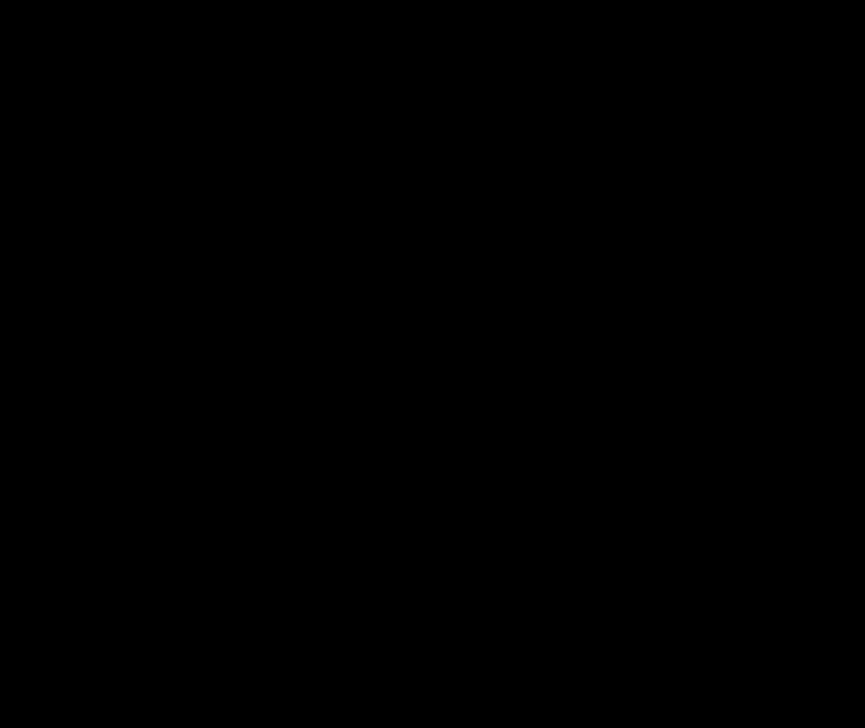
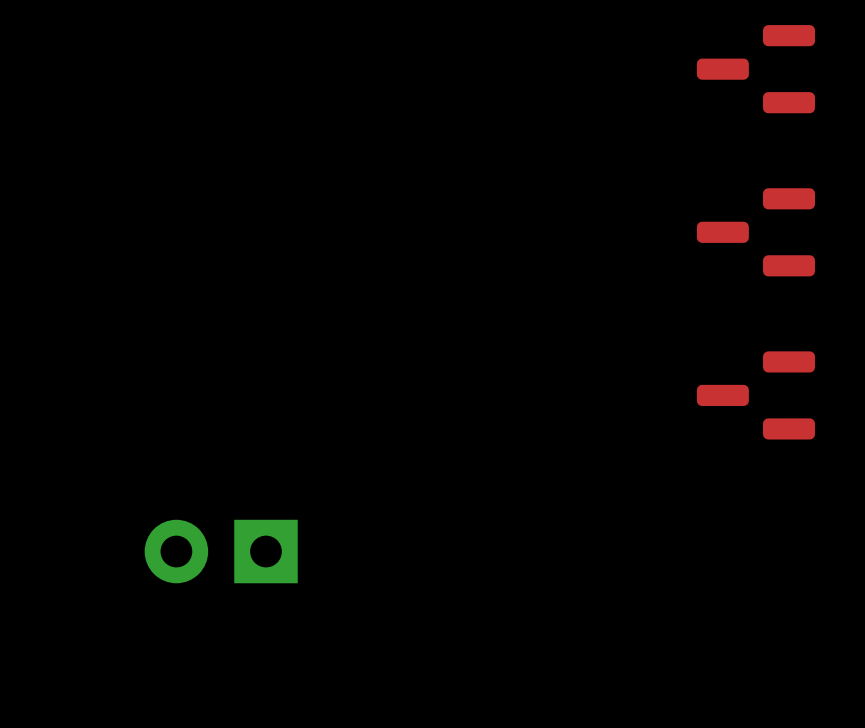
part: none -> (755, 69)
part: none -> (755, 232)
part: none -> (755, 395)
part: none -> (221, 551)

